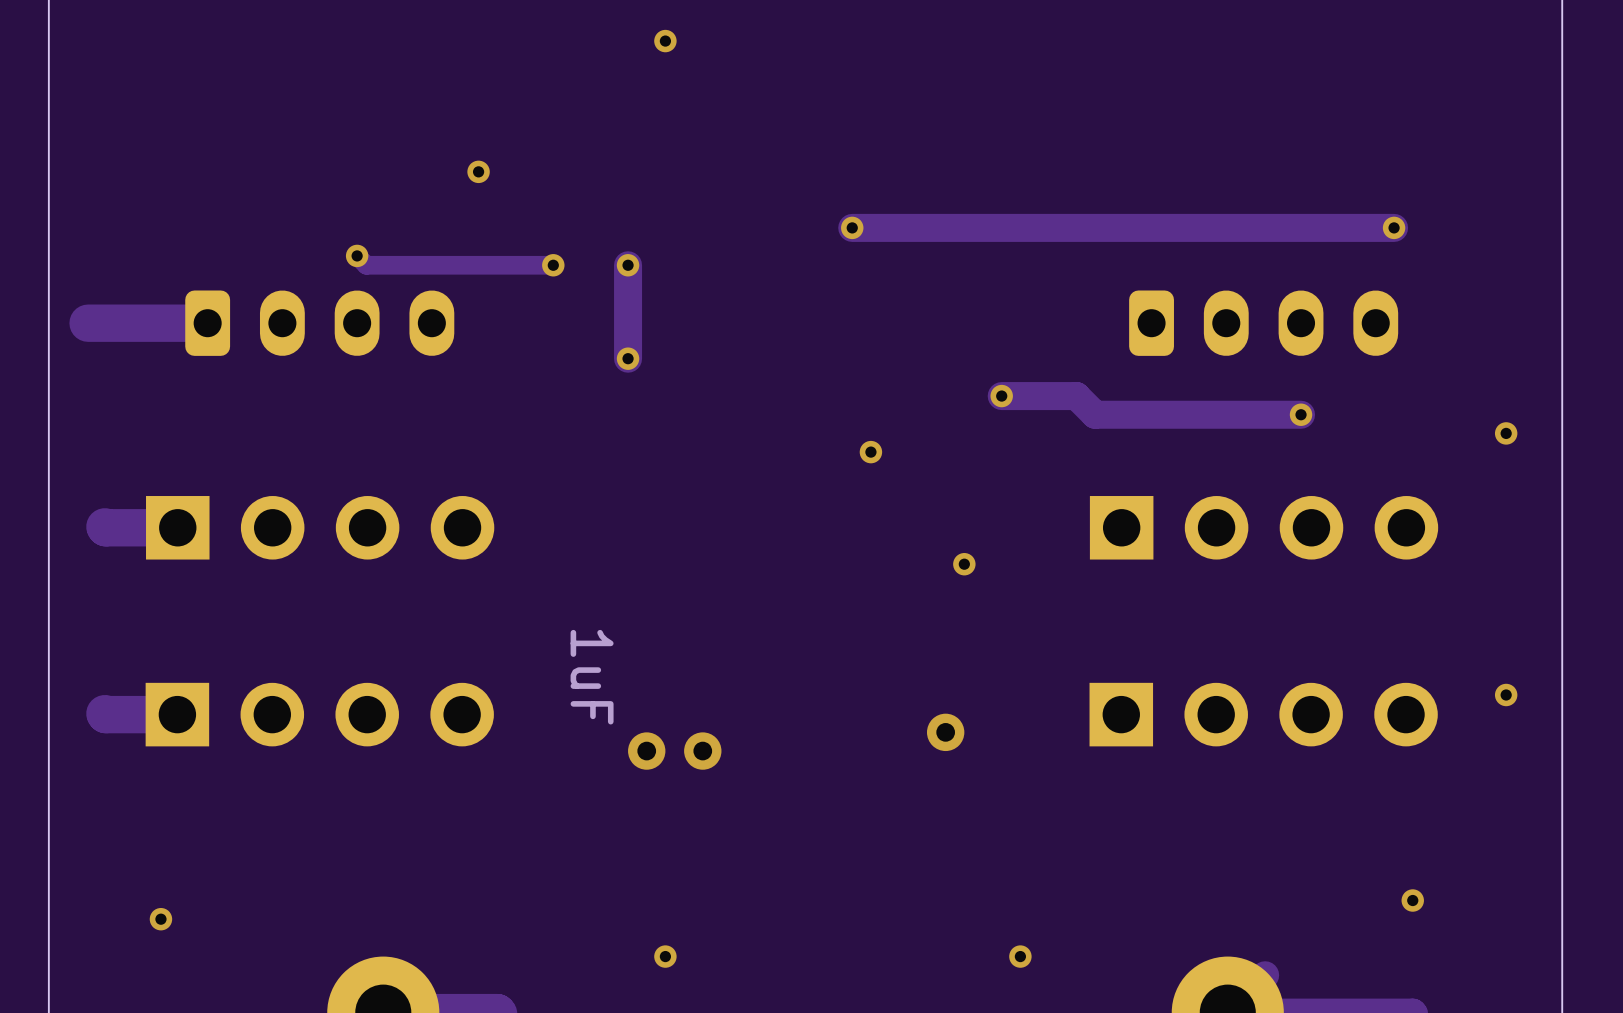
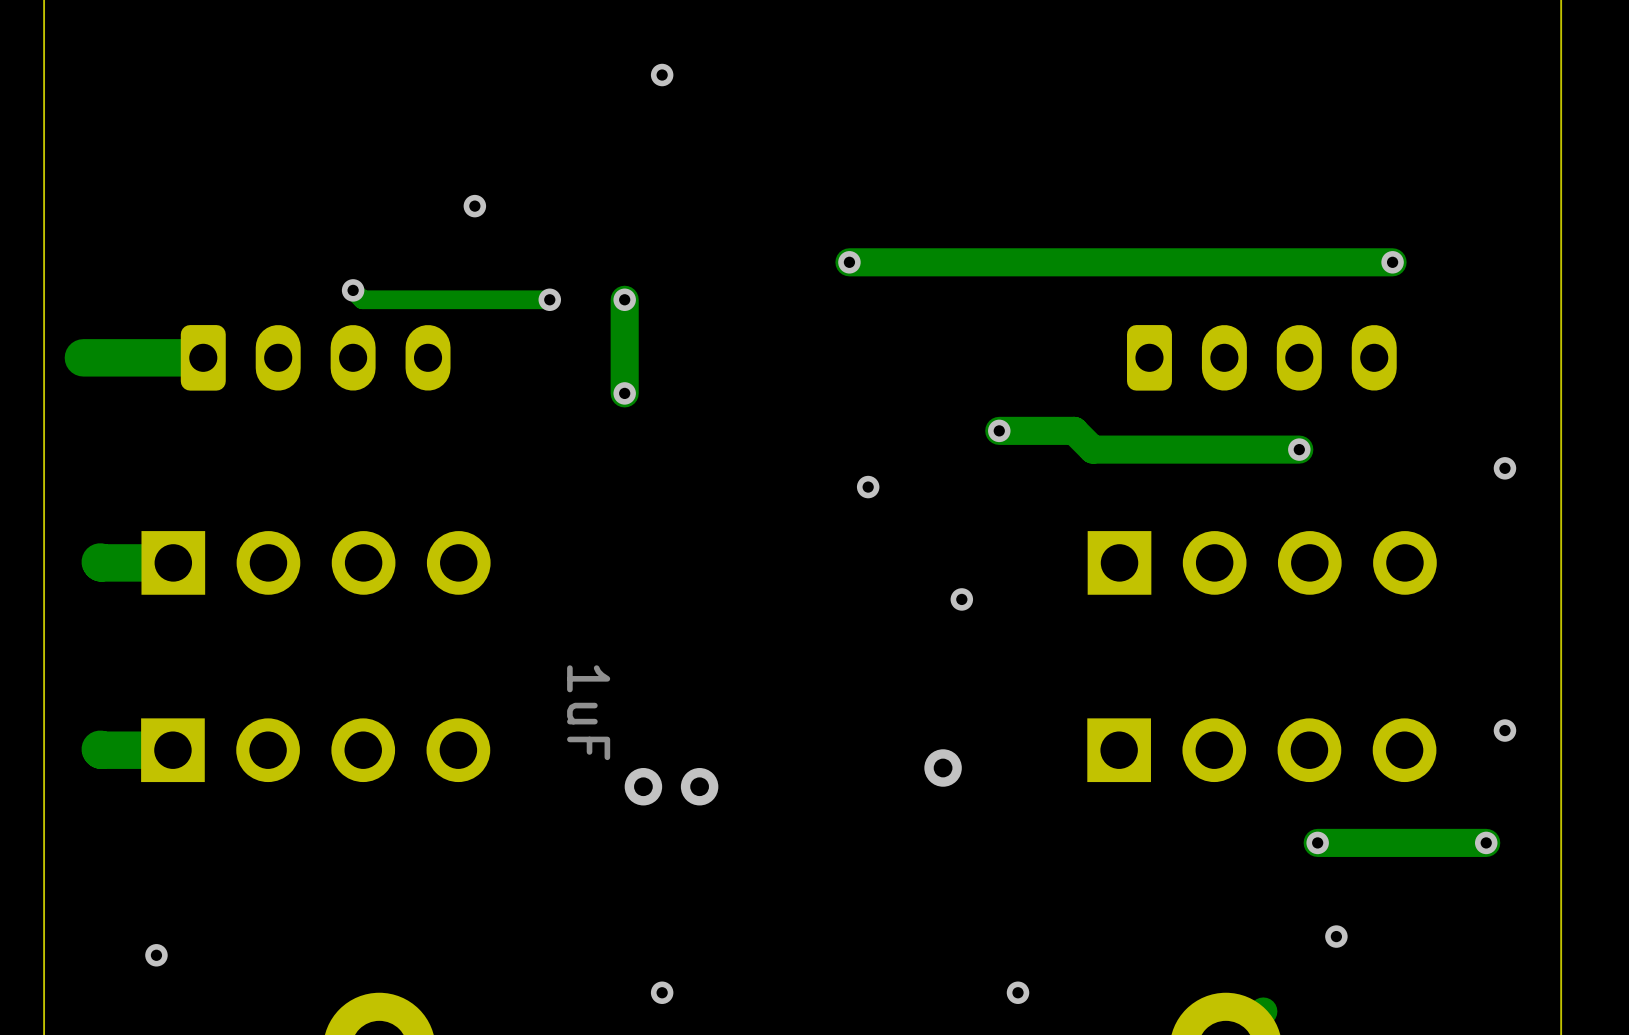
via: none -> (1317, 842)
track: none -> (1486, 842) (1317, 842)
via: none -> (1486, 842)
via: none -> (1336, 936)
via: (1412, 900) -> none

